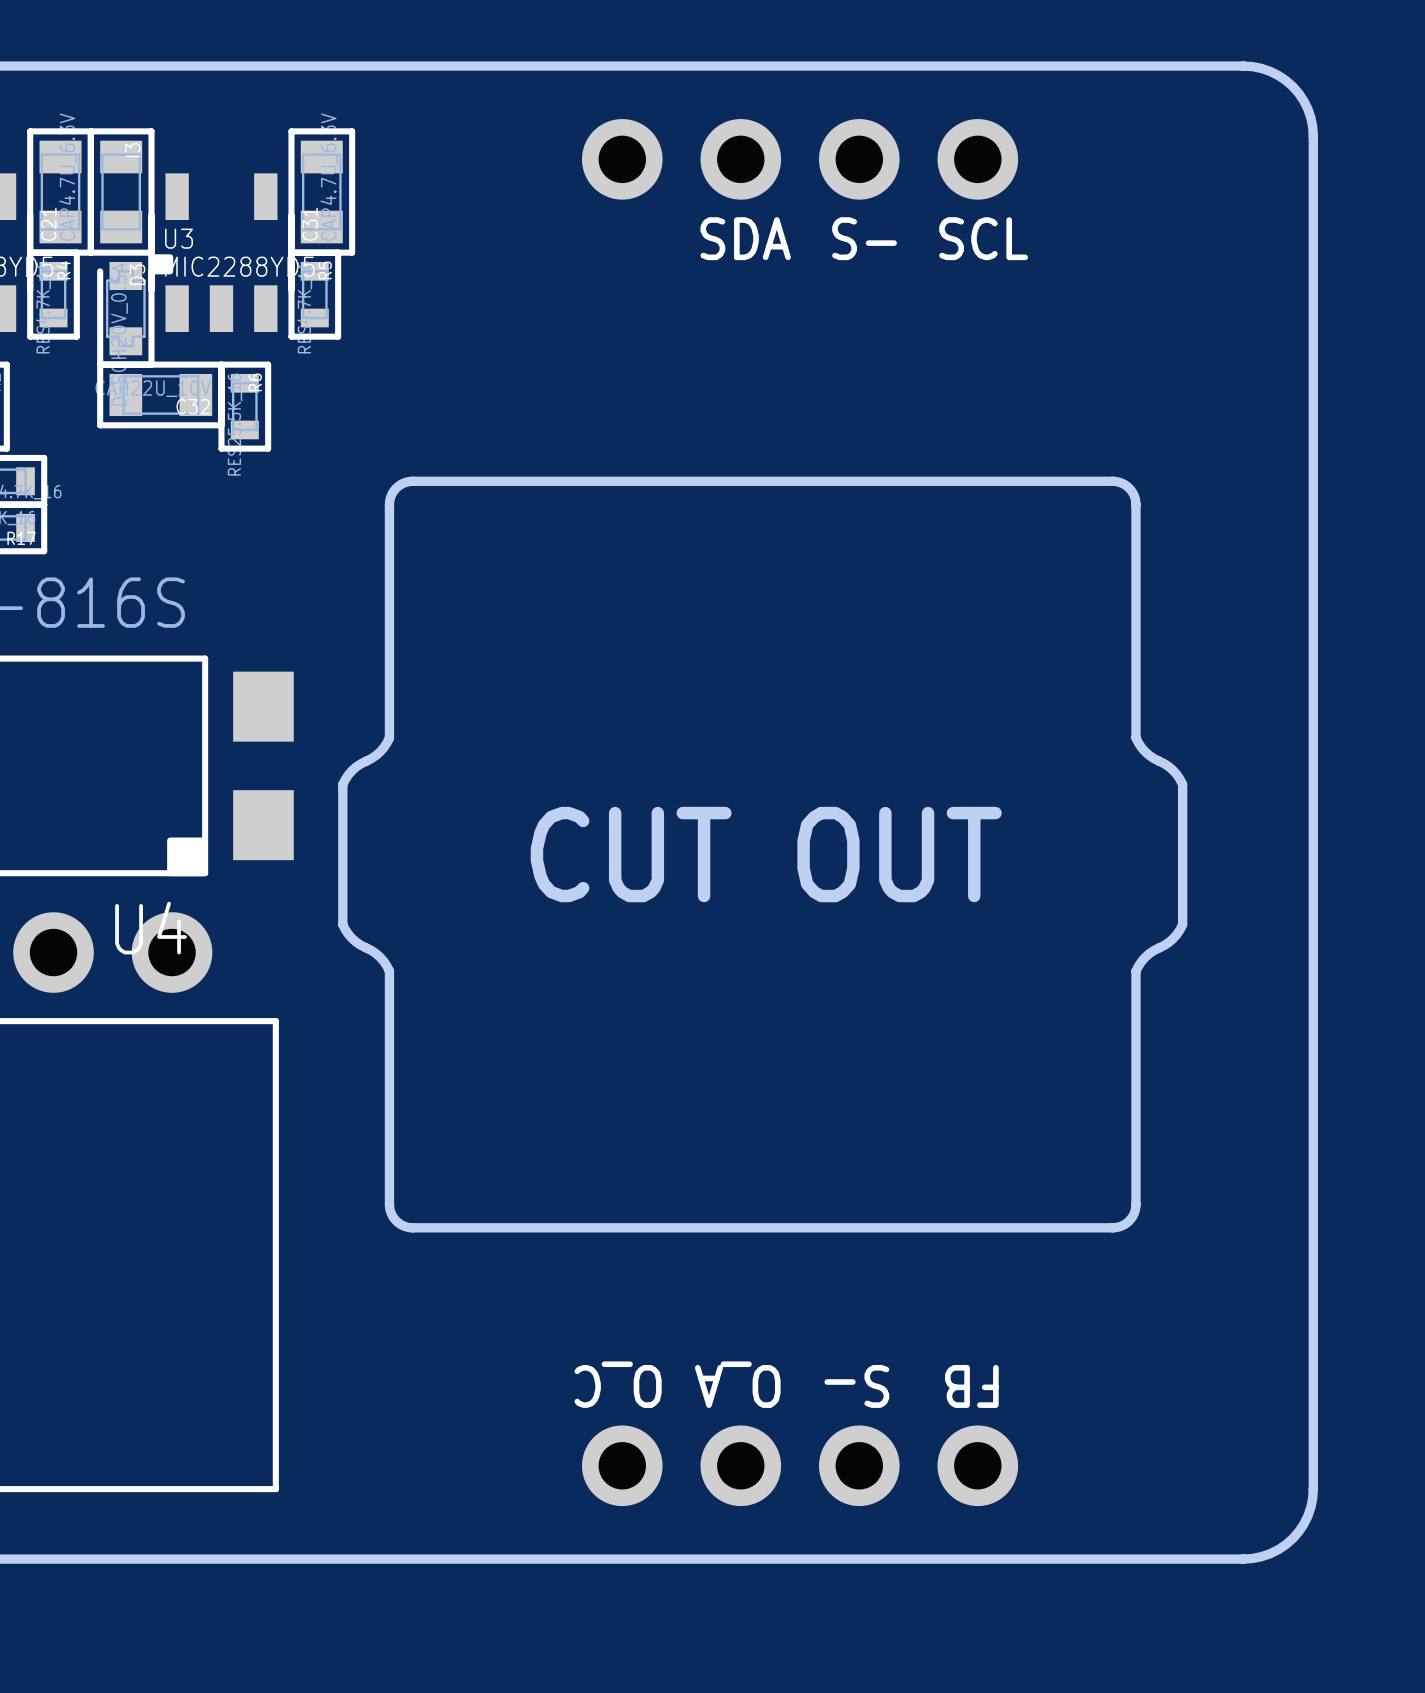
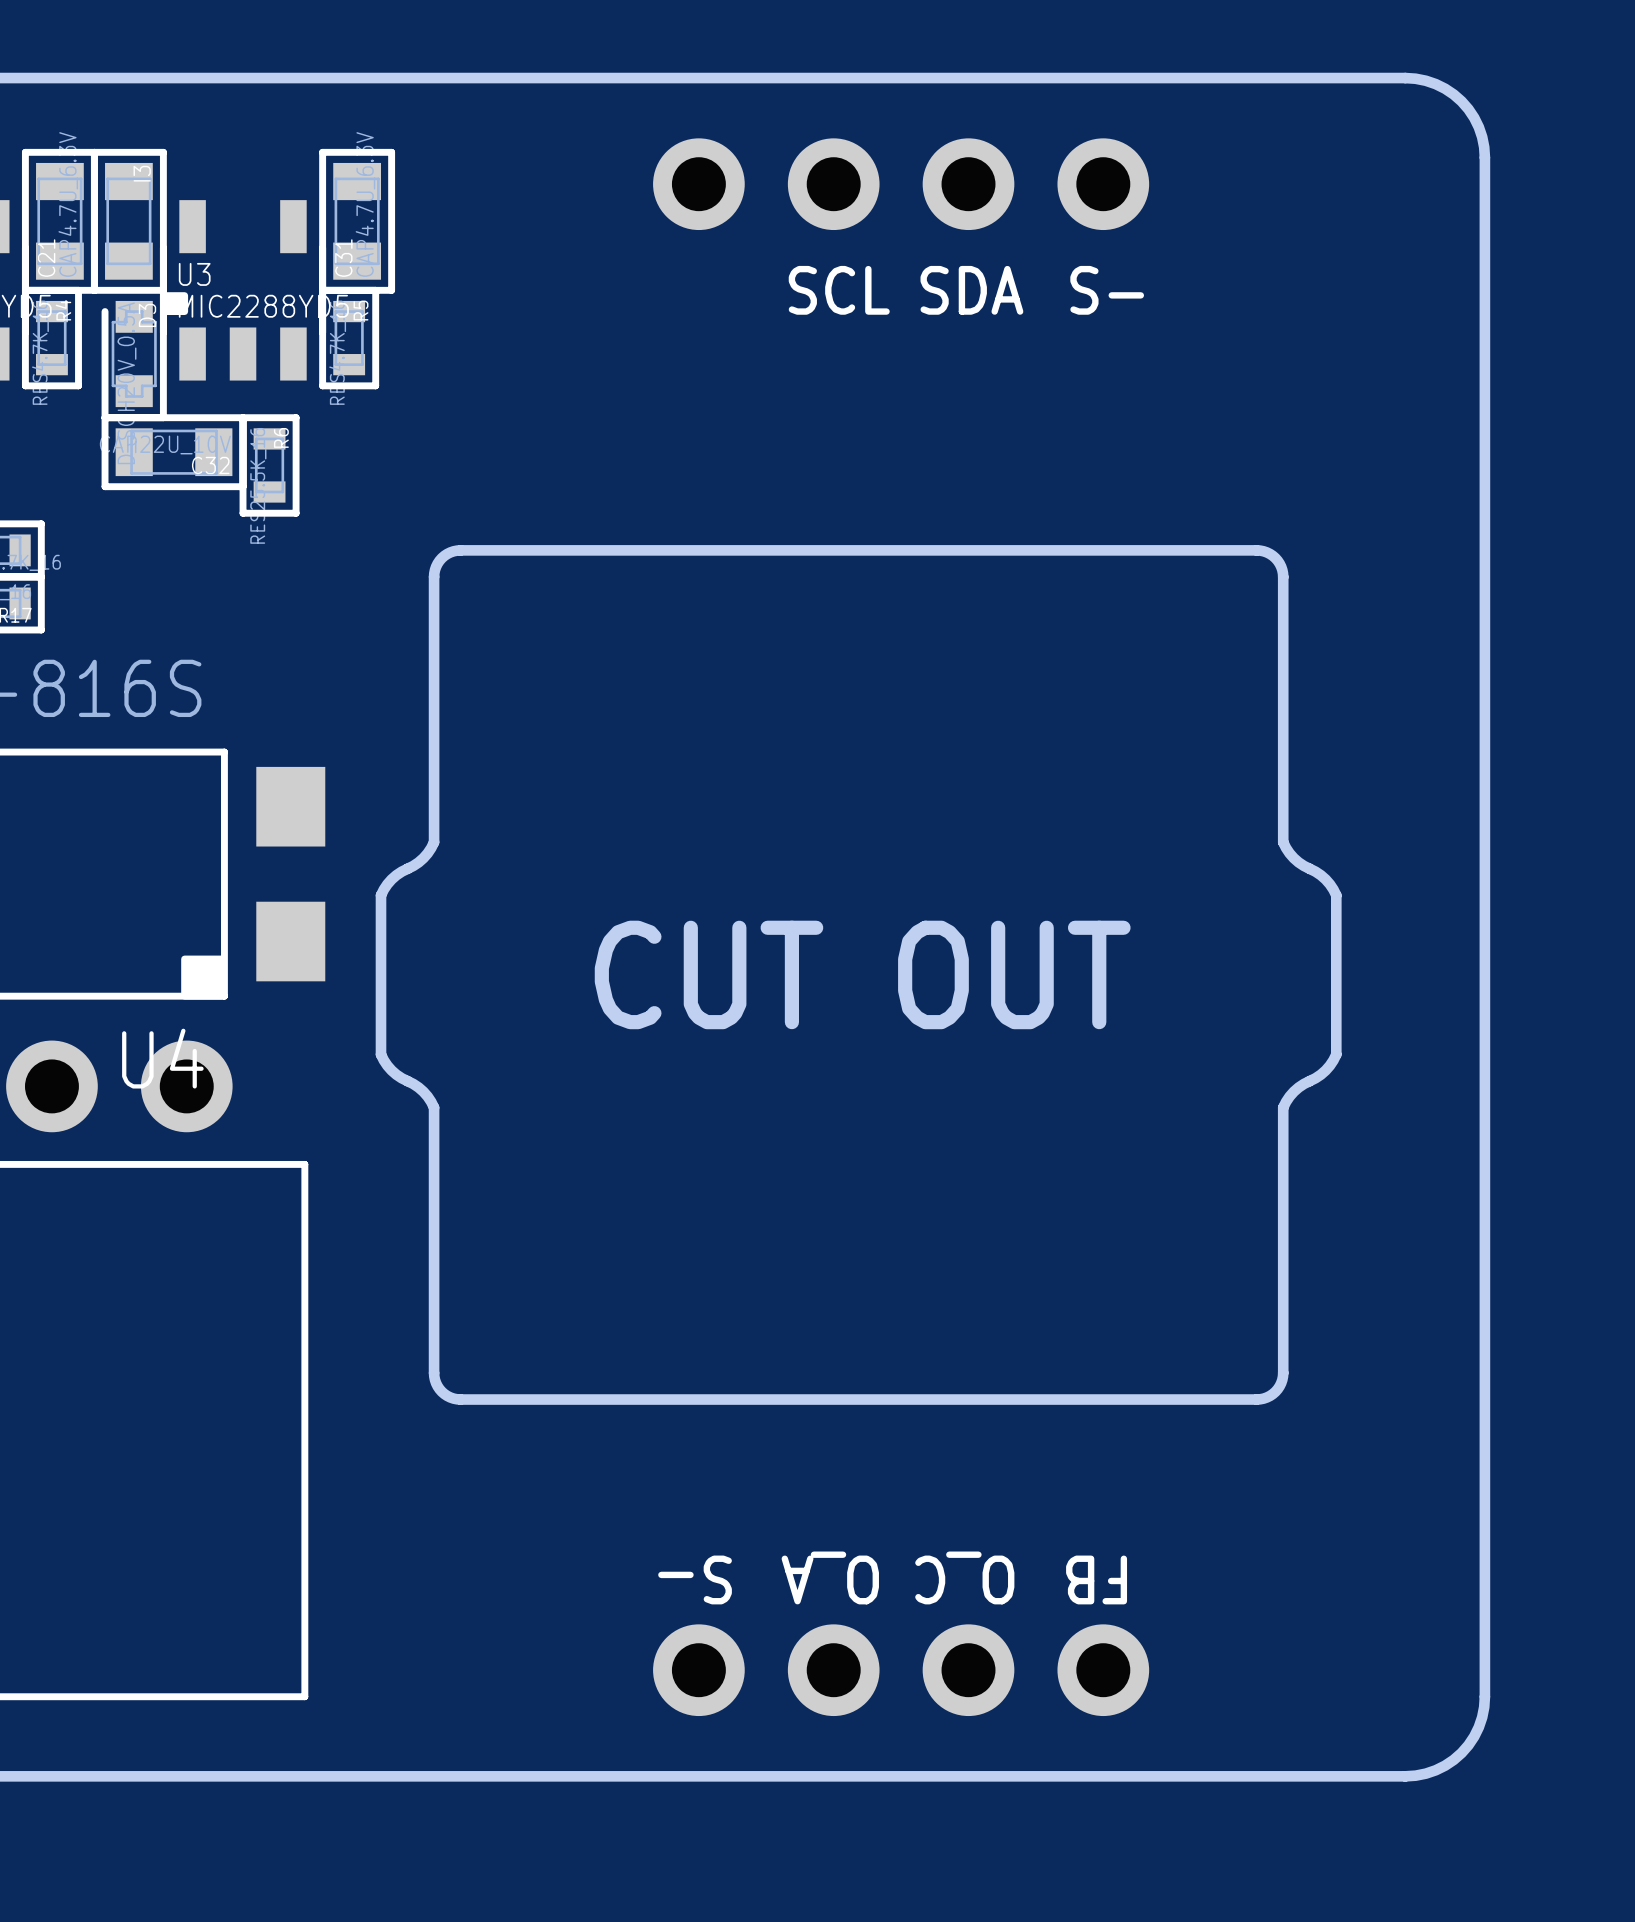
text: SDA (745, 238) -> SCL (839, 290)
text: S- (864, 238) -> SDA (971, 290)
text: SCL (983, 238) -> S- (1107, 290)
text: O_C (618, 1384) -> S- (695, 1579)
text: S- (856, 1386) -> O_C (964, 1577)

